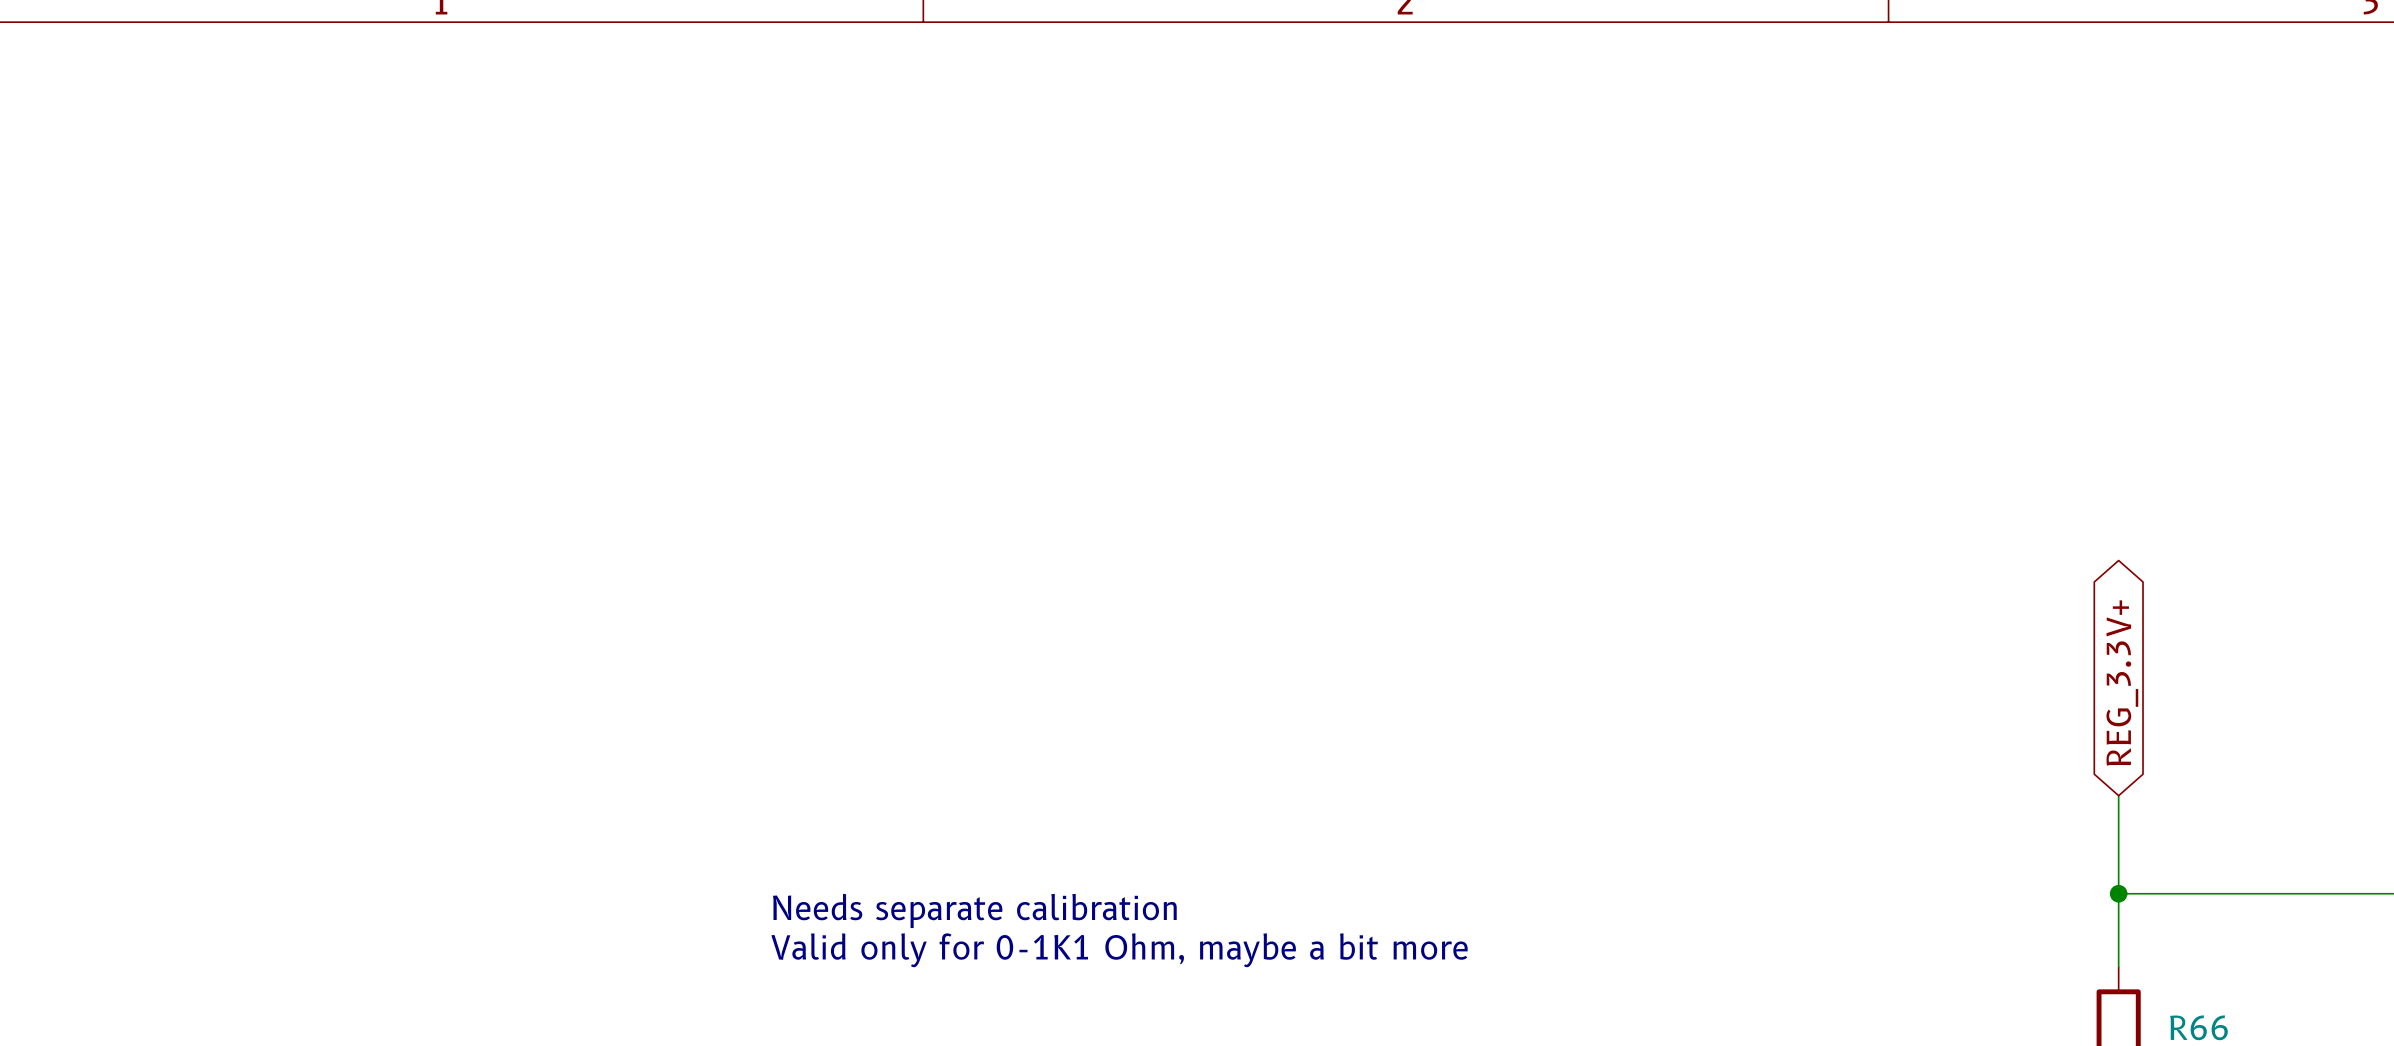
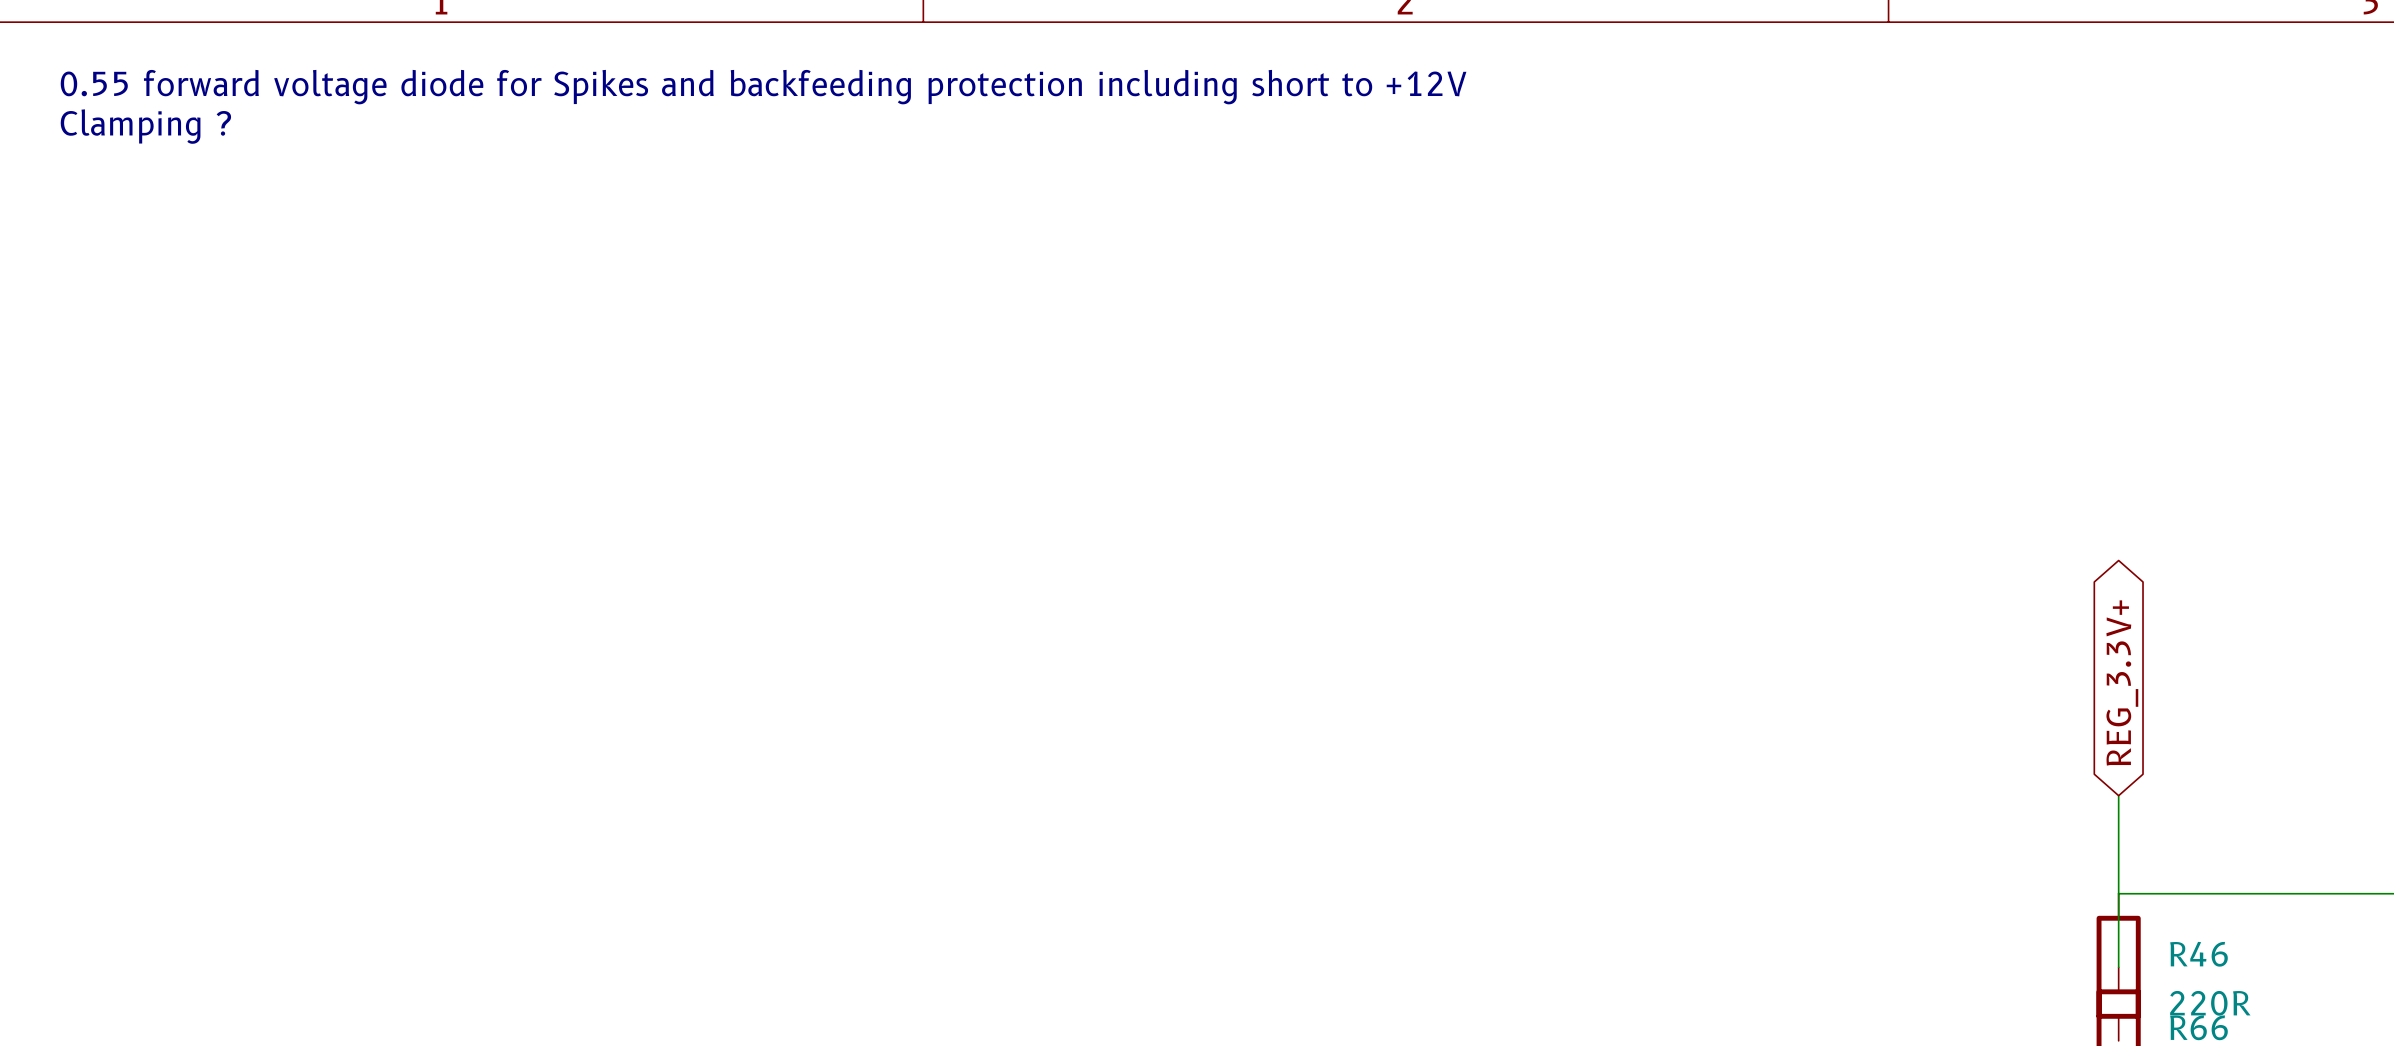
text: none -> 0.55 forward voltage diode for Spikes and backfeeding protection including short to +12V (763, 87)
text: none -> Clamping ? (145, 126)
junction: (2118, 893) -> none
text: Needs separate calibration (974, 910) -> none
text: Valid only for 0-1K1 Ohm, maybe a bit more (1119, 950) -> none
R46: none -> 220R (2118, 967)

